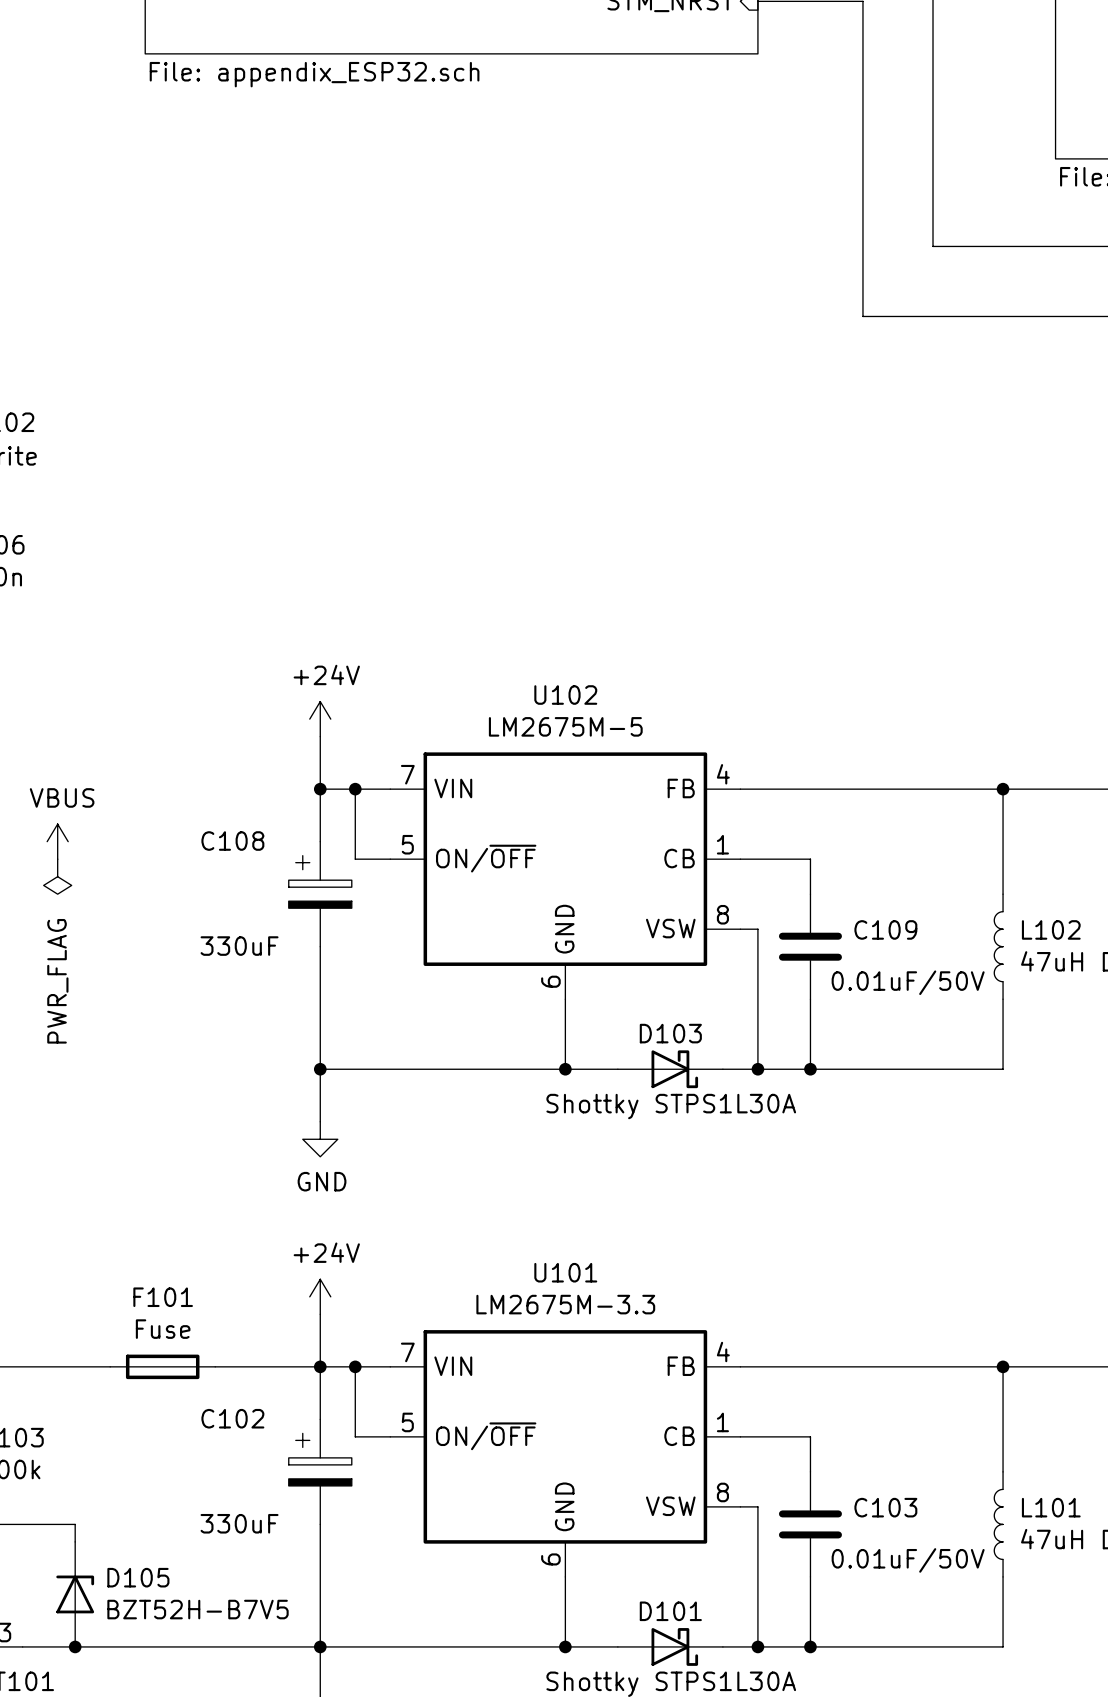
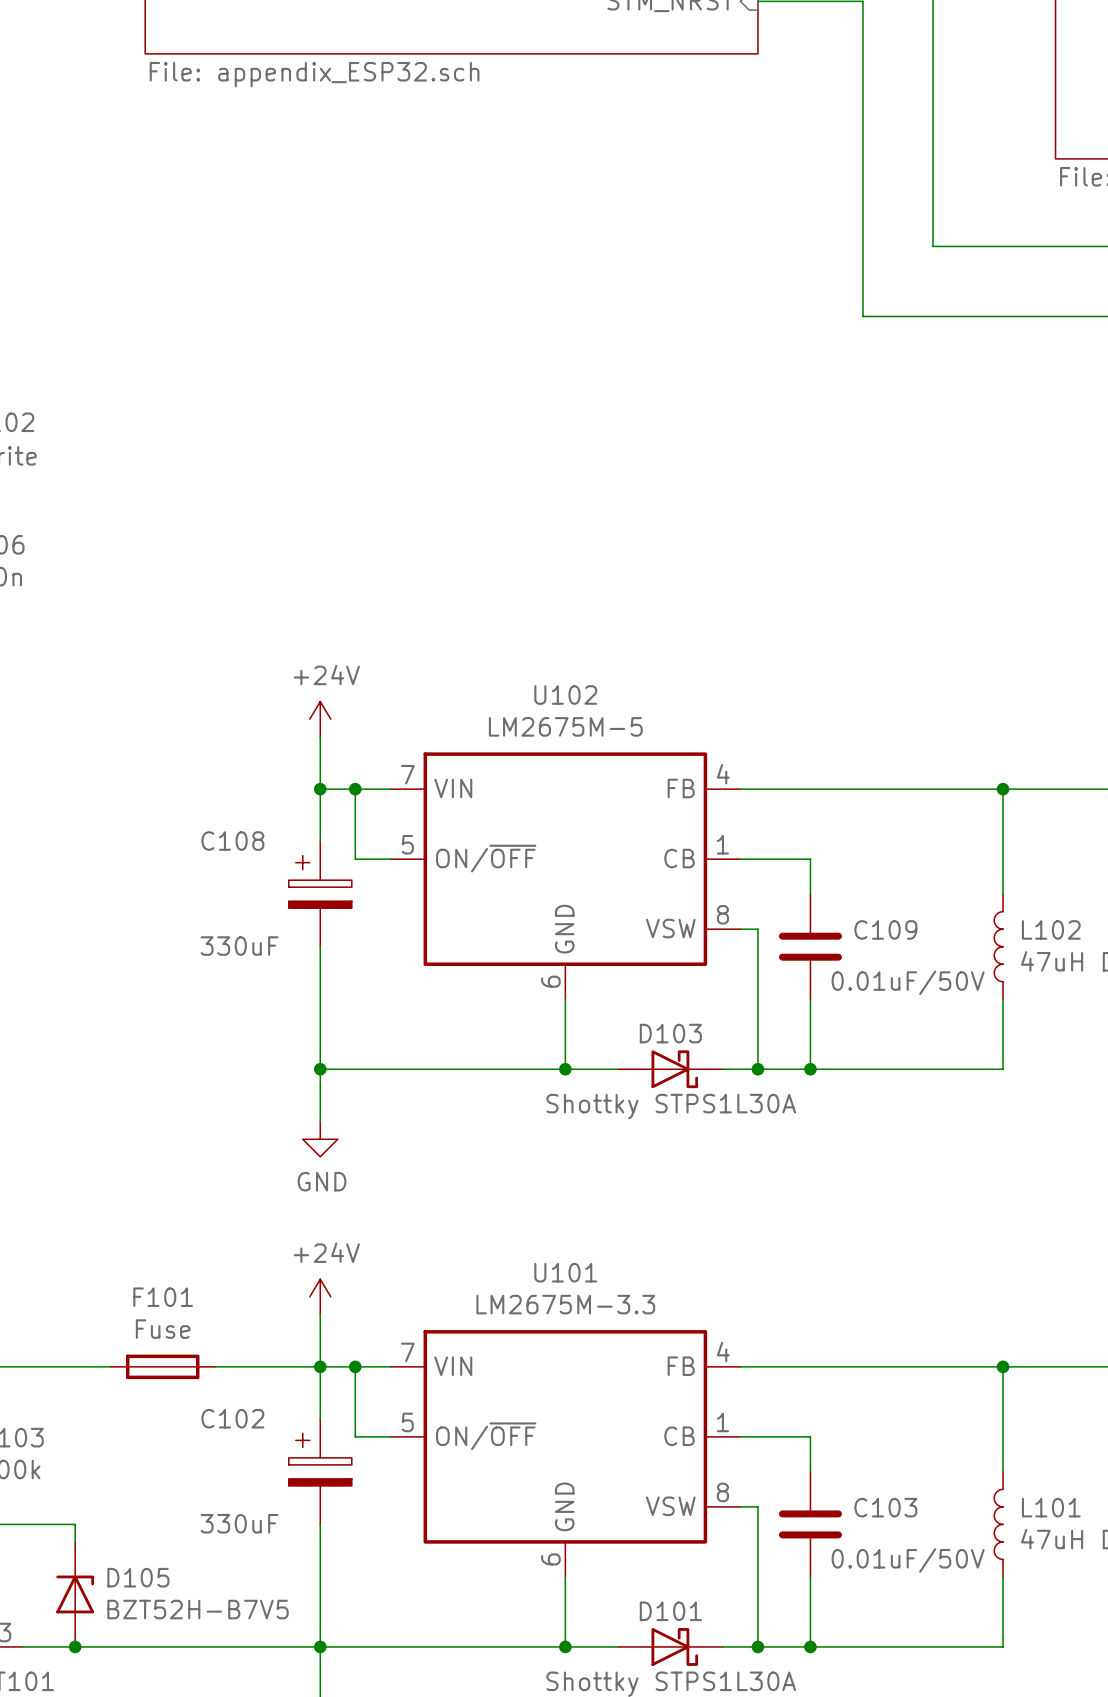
power symbol: VBUS (57, 841) -> none
power symbol: PWR_FLAG (57, 876) -> none

